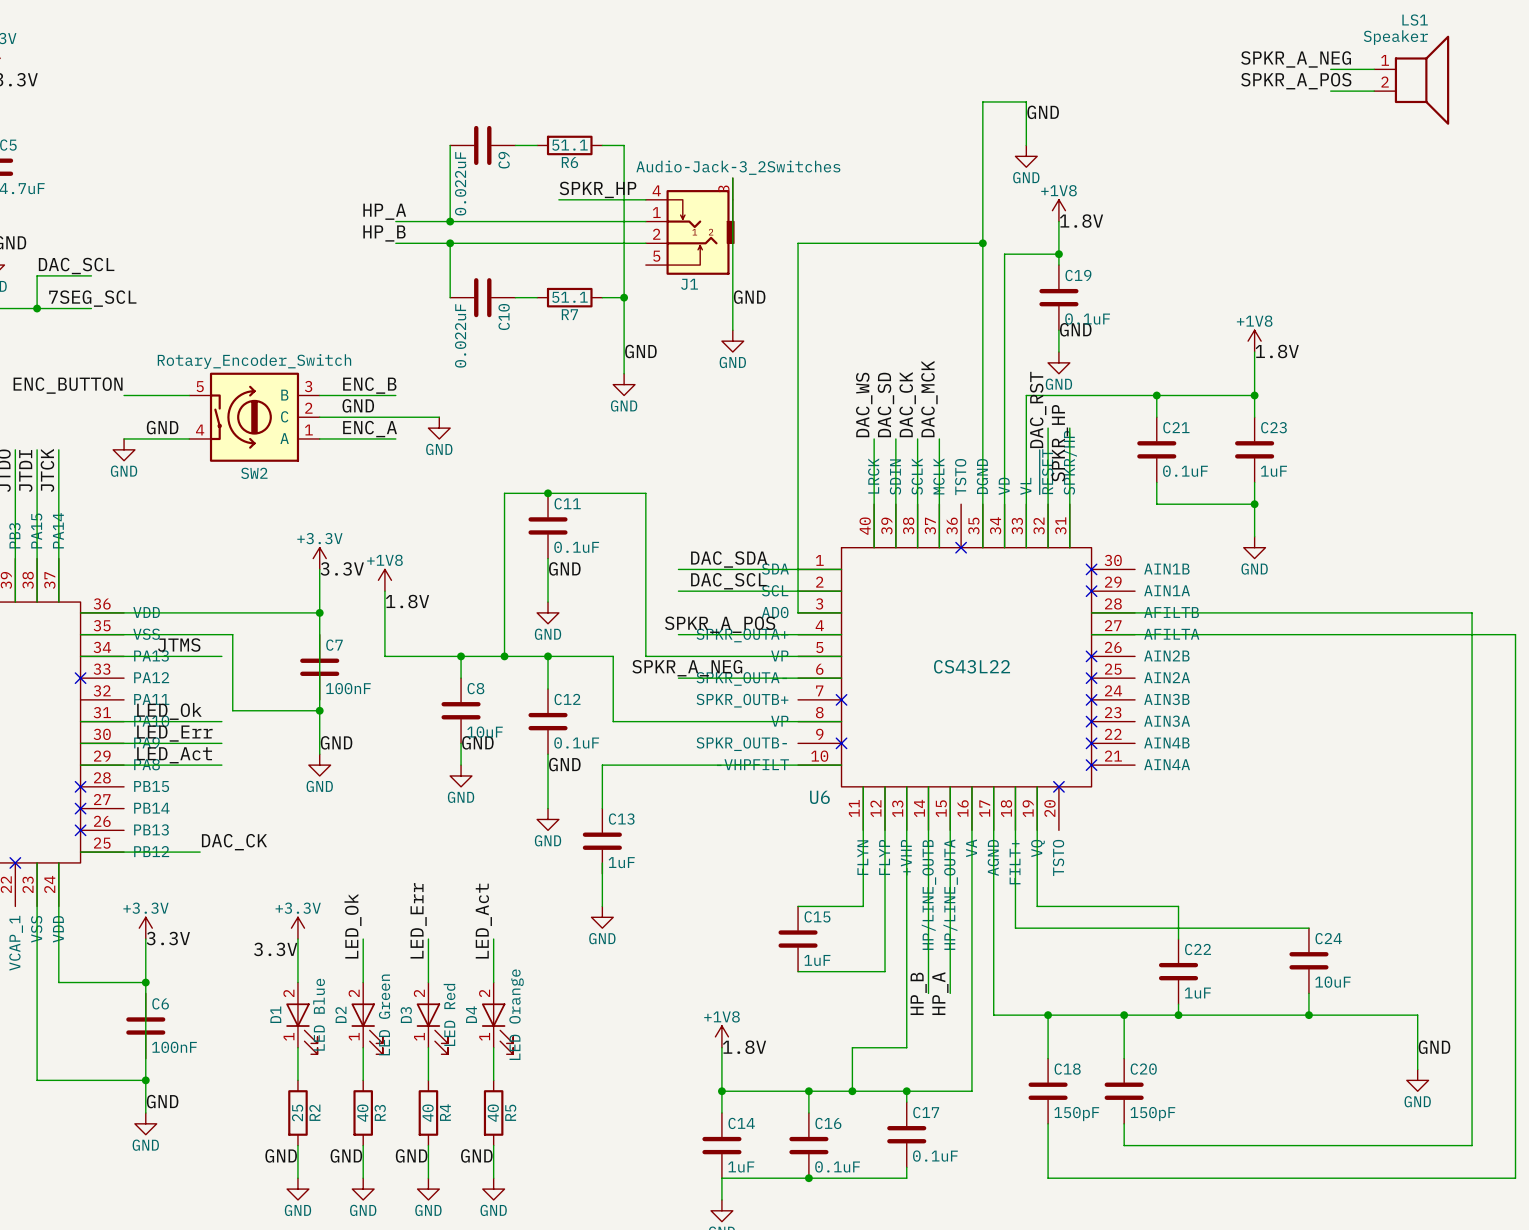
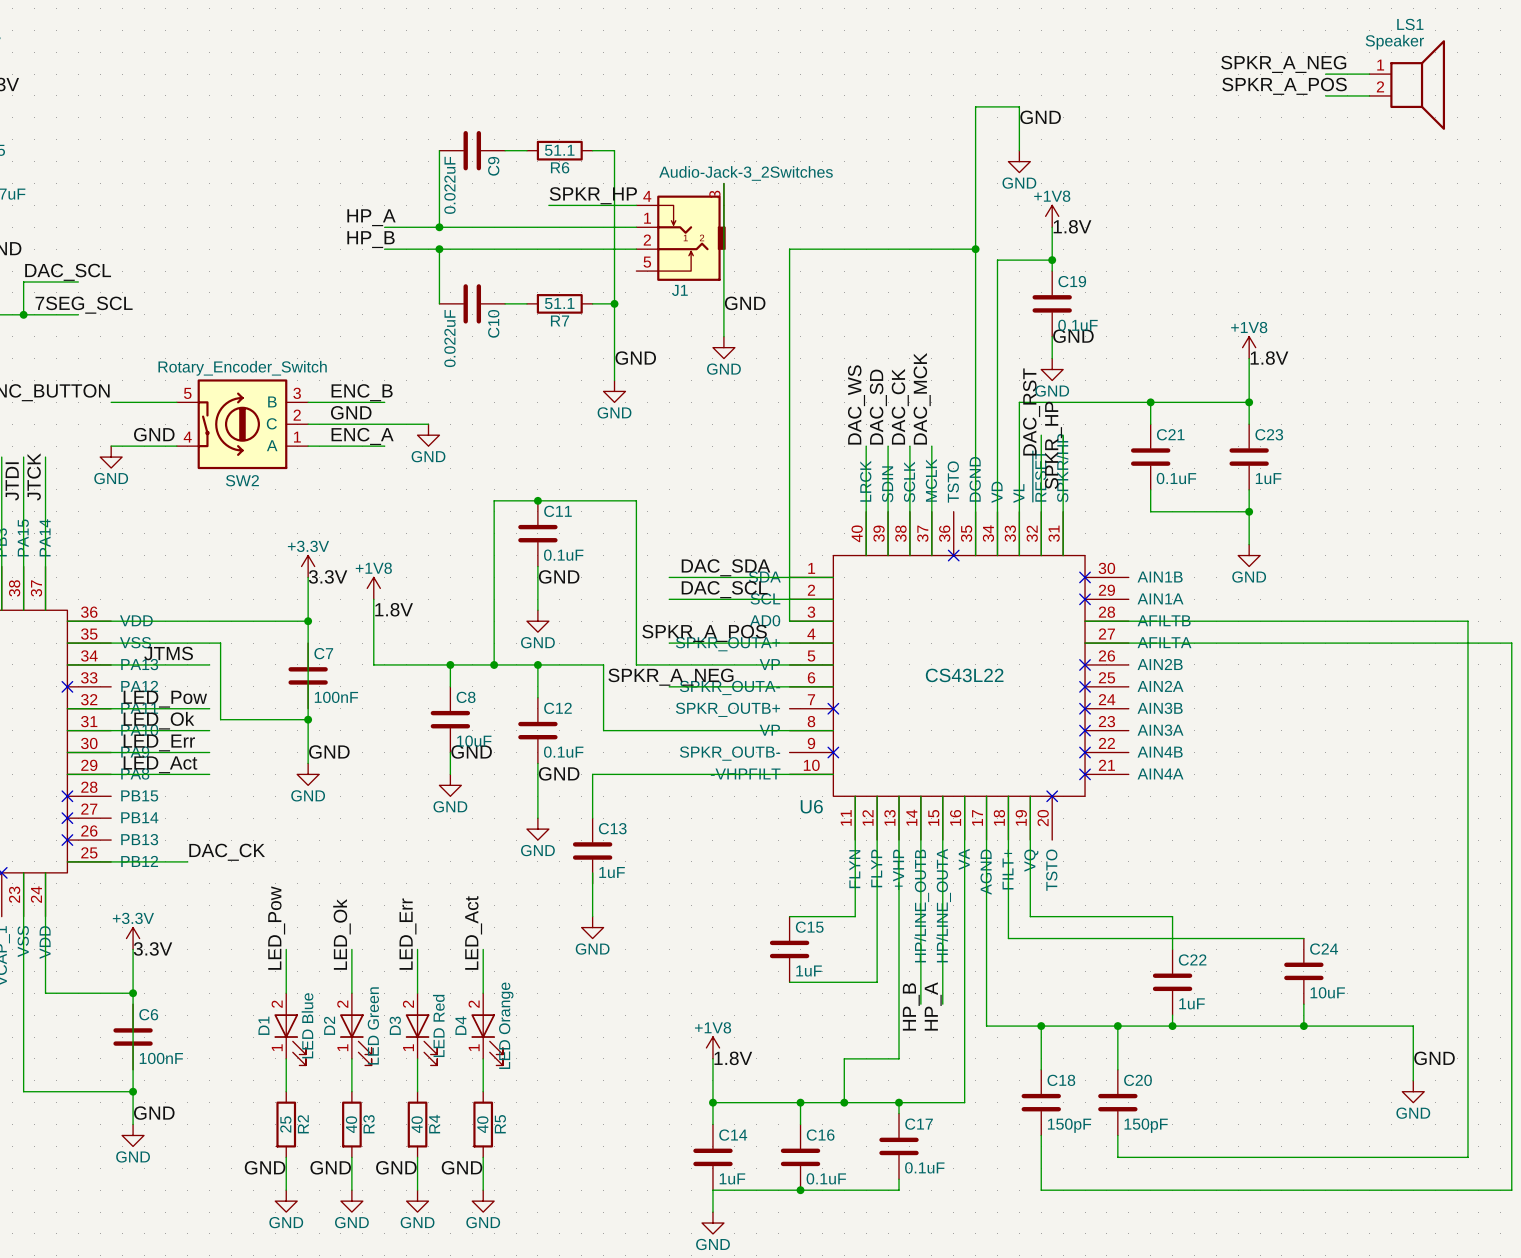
label: none -> LED_Pow (165, 699)
wire: none -> (67, 708) (209, 708)
power symbol: +3.3V (297, 928) -> none
label: 3.3V (275, 949) -> LED_Pow (276, 928)

